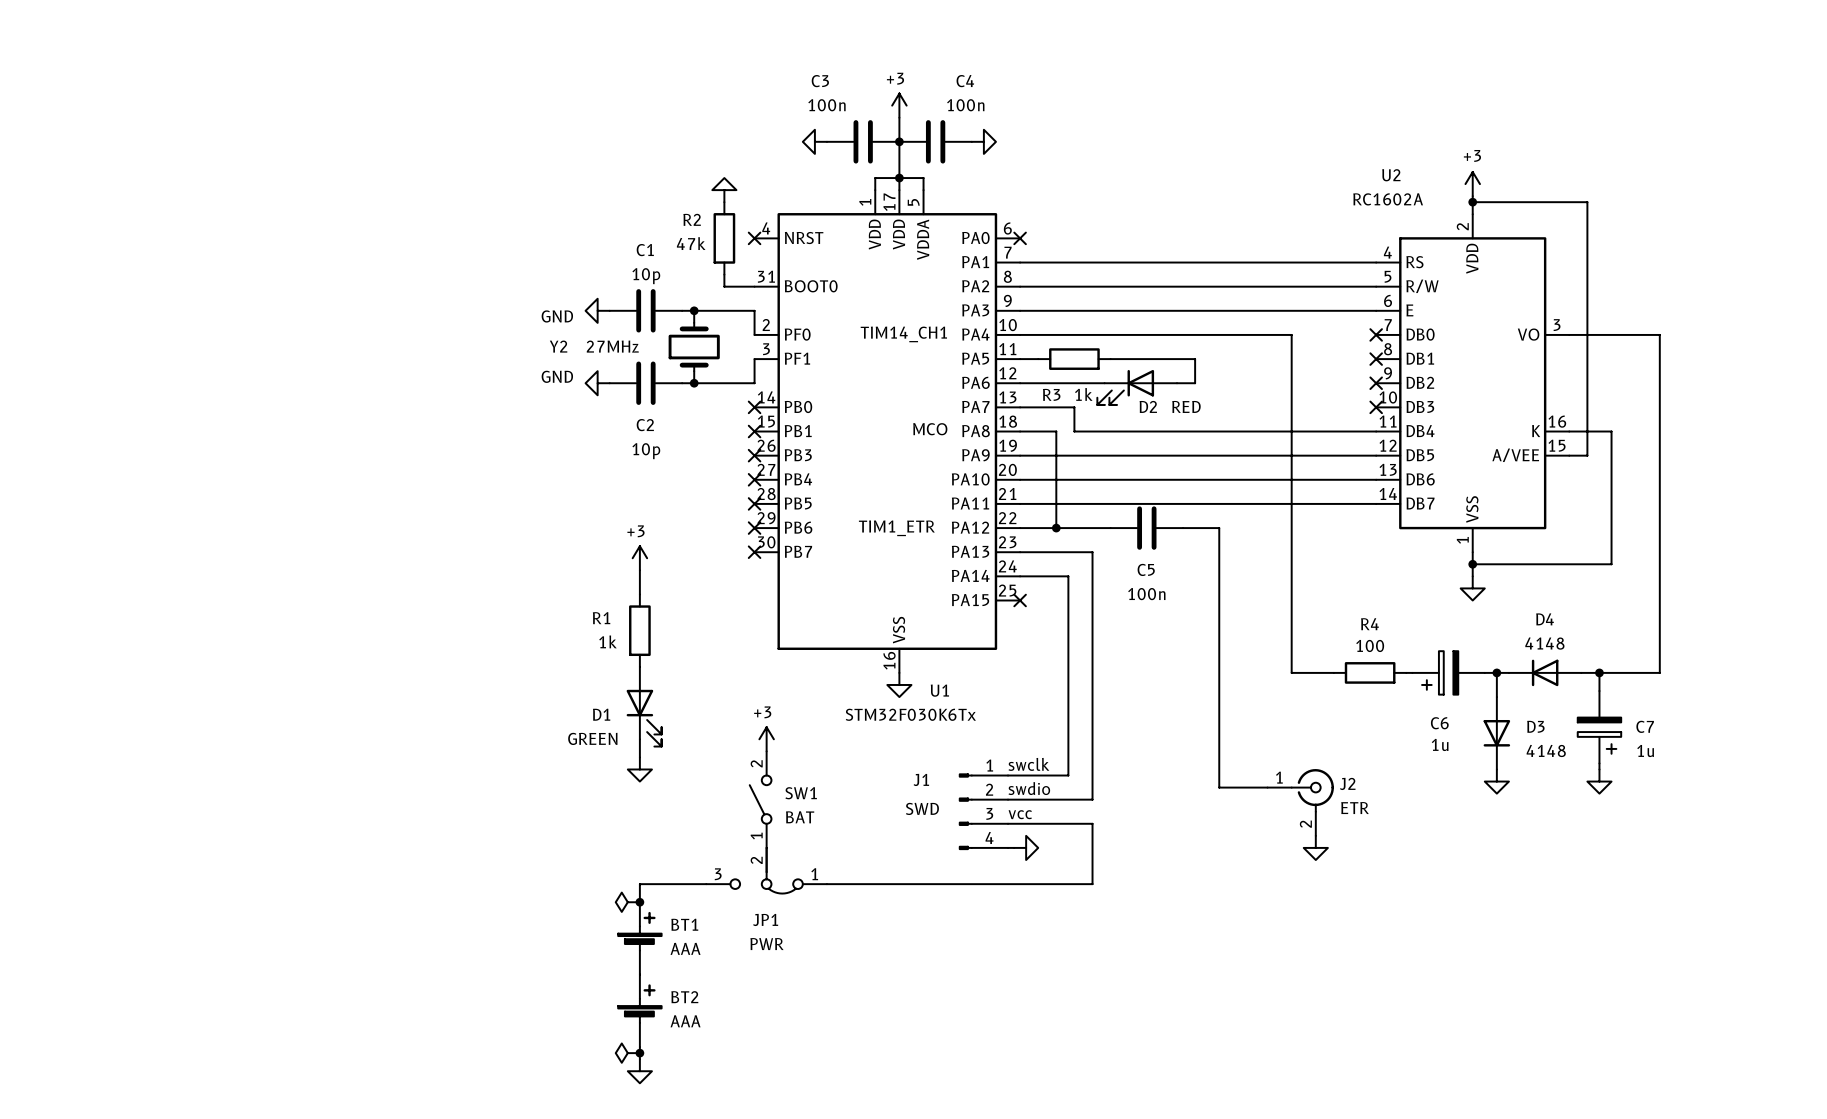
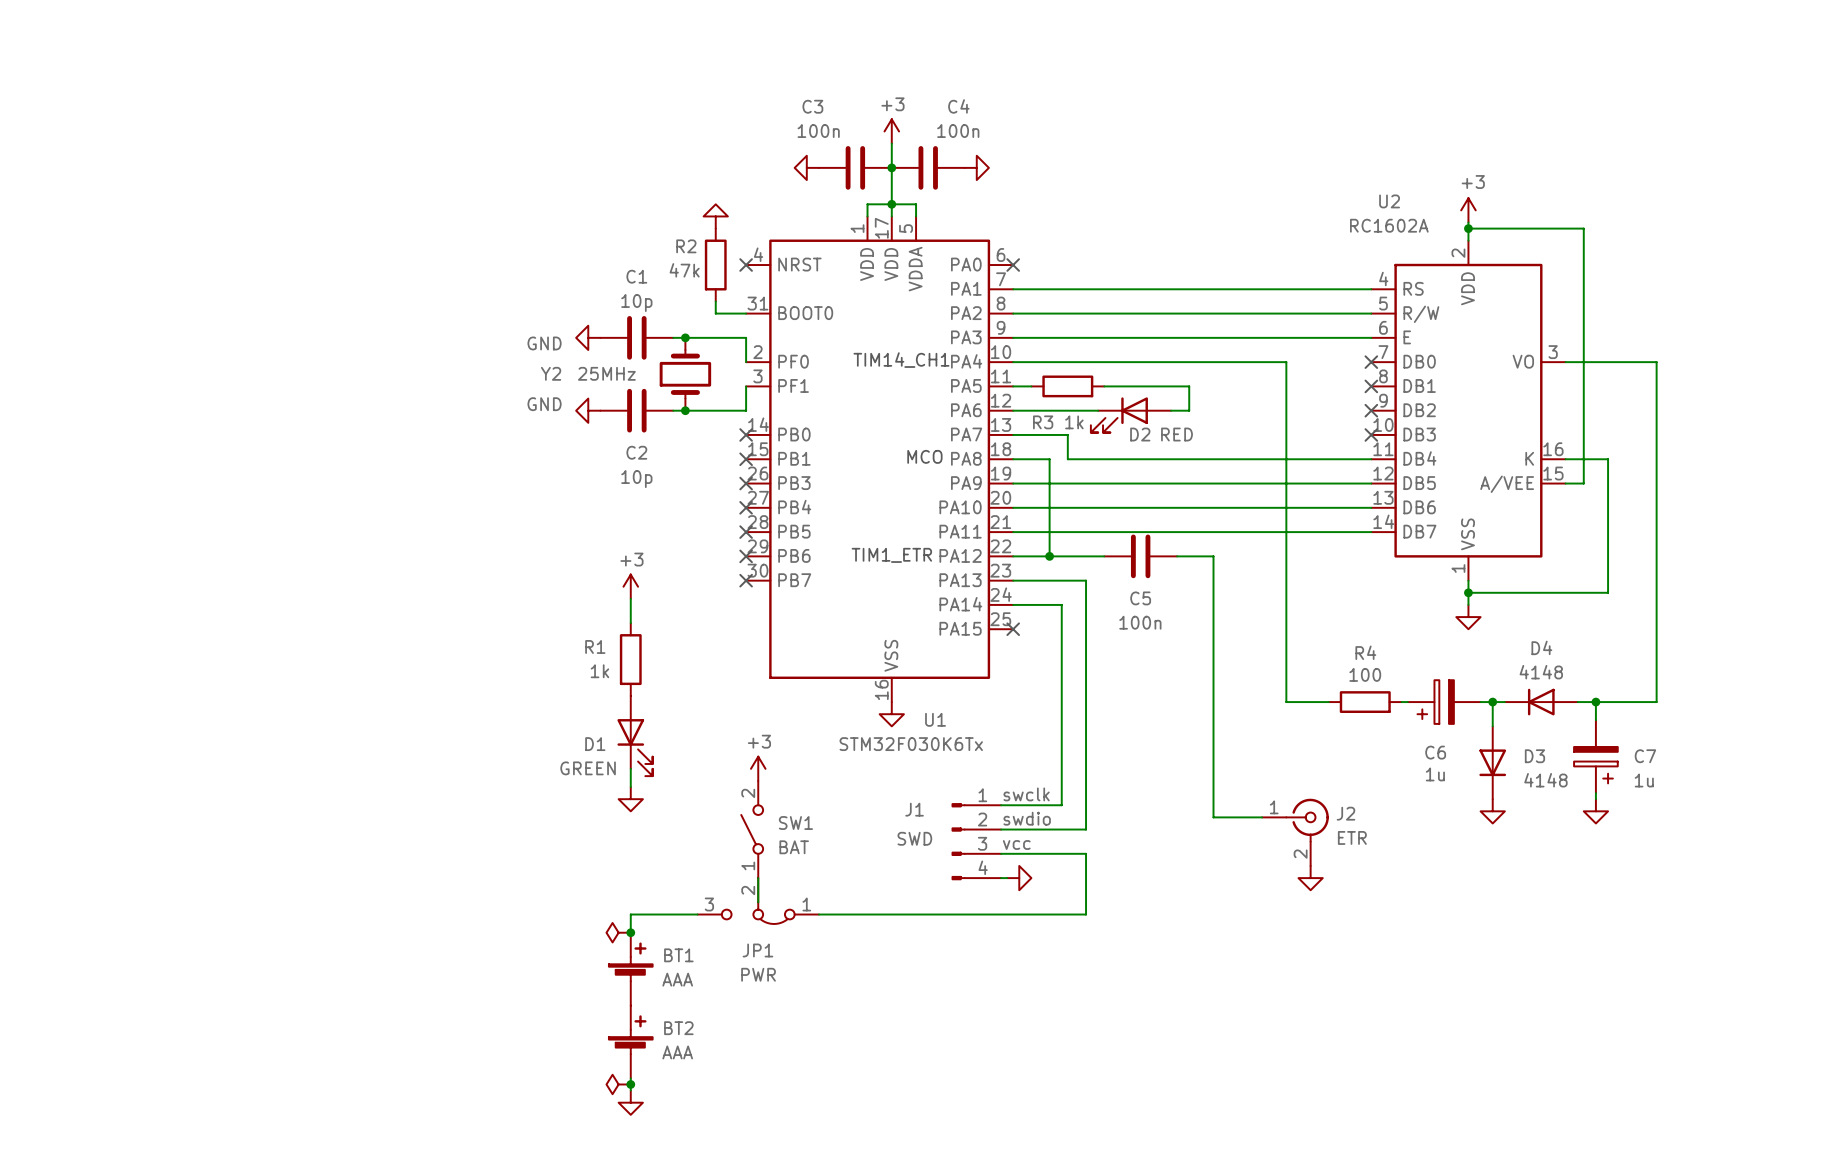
Y2 value: 27MHz (612, 346) -> 25MHz (606, 373)

